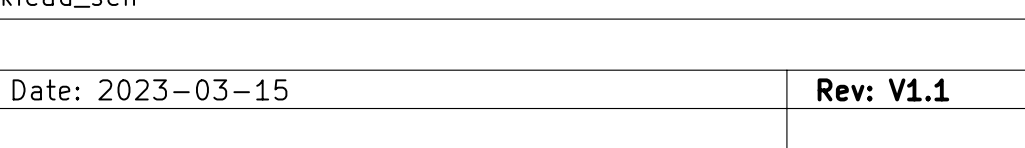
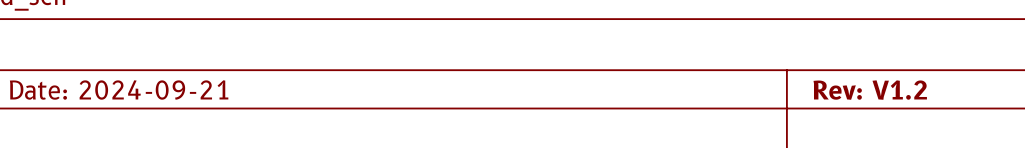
title block: Date: 2023-03-15 (149, 89) -> Date: 2024-09-21 (119, 90)
title block: Rev: V1.1 (883, 89) -> Rev: V1.2 (870, 90)

